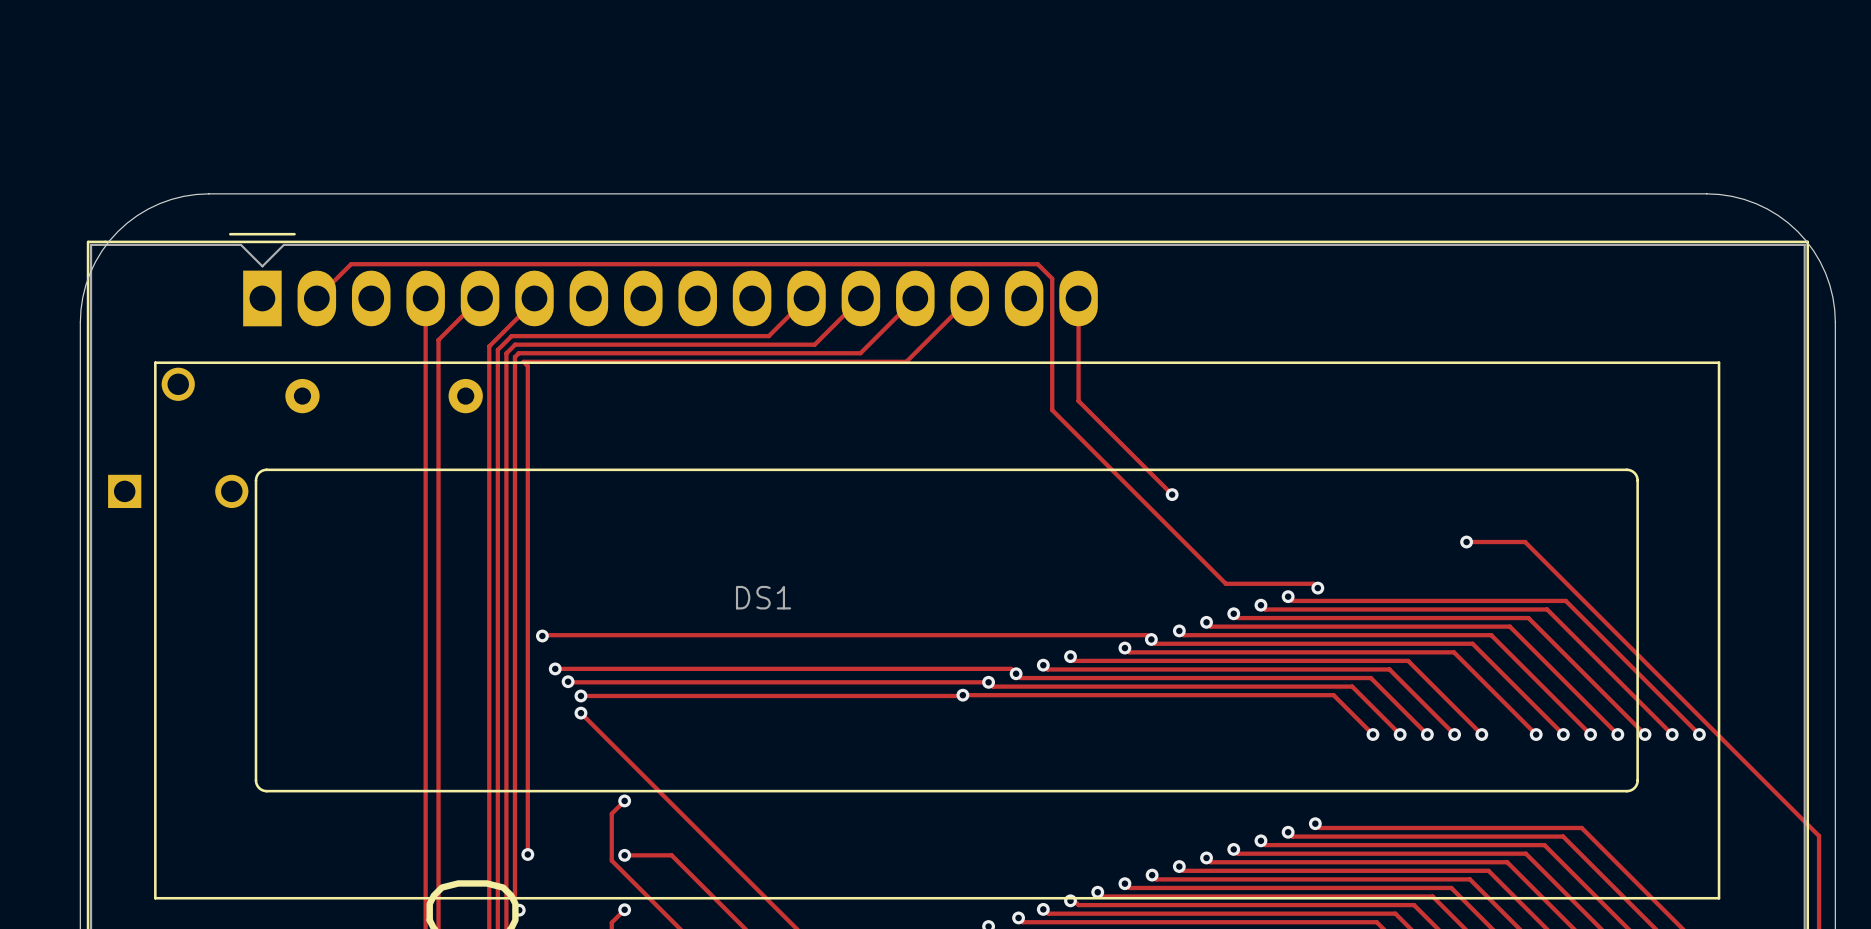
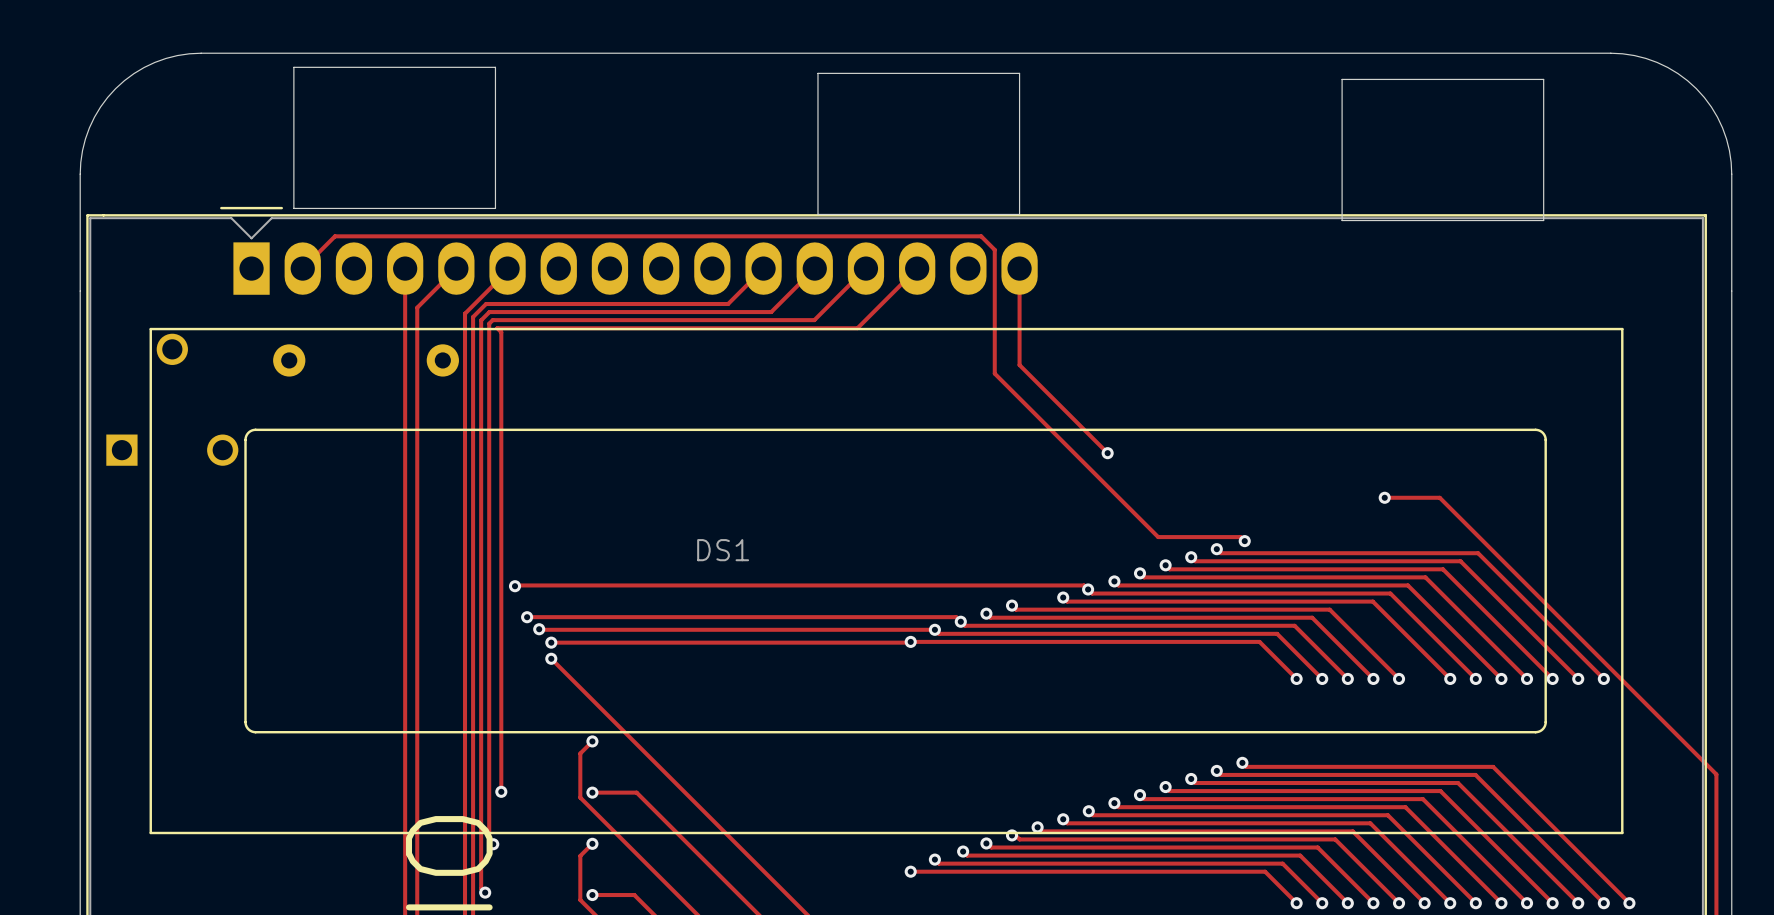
board edge: none -> (293, 67) (495, 67) (495, 208) (293, 208) (293, 67)
board edge: none -> (817, 73) (1019, 73) (1019, 214) (817, 214) (817, 73)
board edge: none -> (1342, 79) (1543, 79) (1543, 220) (1342, 220) (1342, 79)
board edge: (80, 322) (82, 297) (90, 273) (102, 250) (117, 231) (137, 215) (159, 203) (183, 196) (208, 193) (1719, 194) (1744, 199) (1767, 209) (1788, 223) (1806, 240) (1820, 261) (1829, 285) (1835, 322) -> (80, 291) (80, 162) (85, 139) (94, 117) (115, 88) (144, 67) (177, 55) (201, 53) (1610, 53) (1634, 55) (1657, 62) (1687, 80) (1704, 97) (1722, 127) (1731, 162) (1731, 291)

